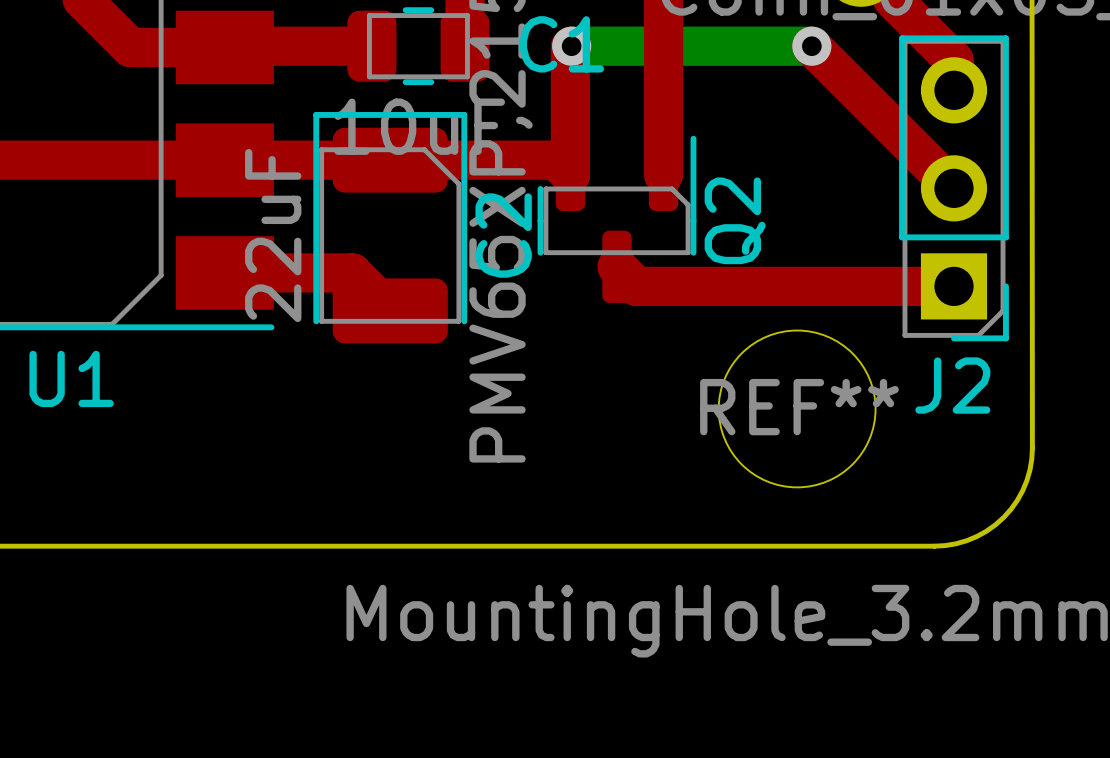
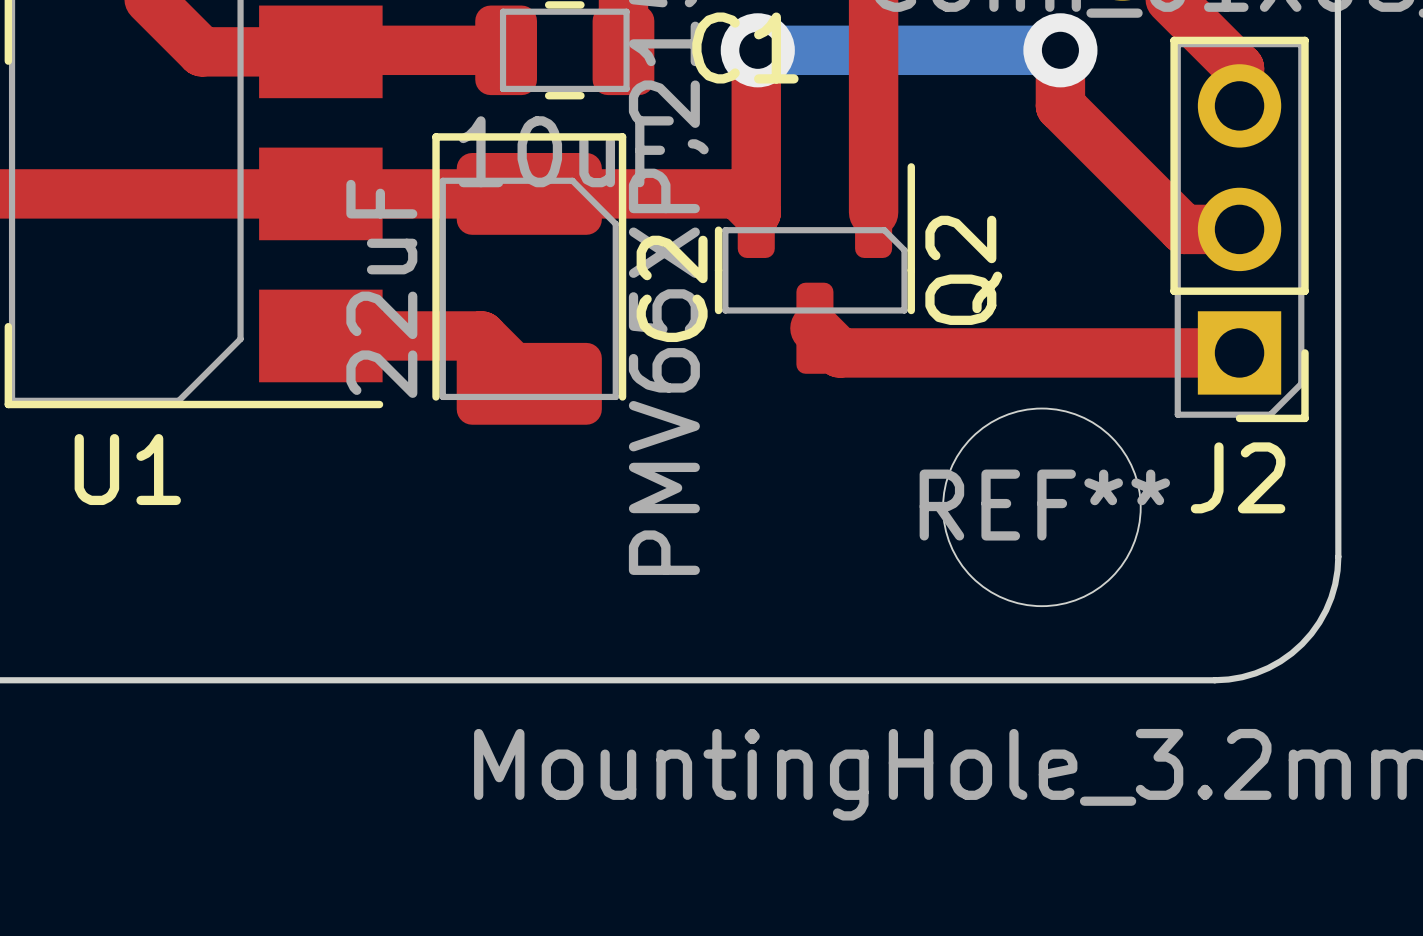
via size: [552, 26, 592, 66] -> [720, 13, 795, 88]
via size: [792, 26, 832, 66] -> [1023, 13, 1098, 88]
top track: (811, 46) (954, 188) -> (1060, 50) (1060, 105) (1183, 229) (1239, 229)

